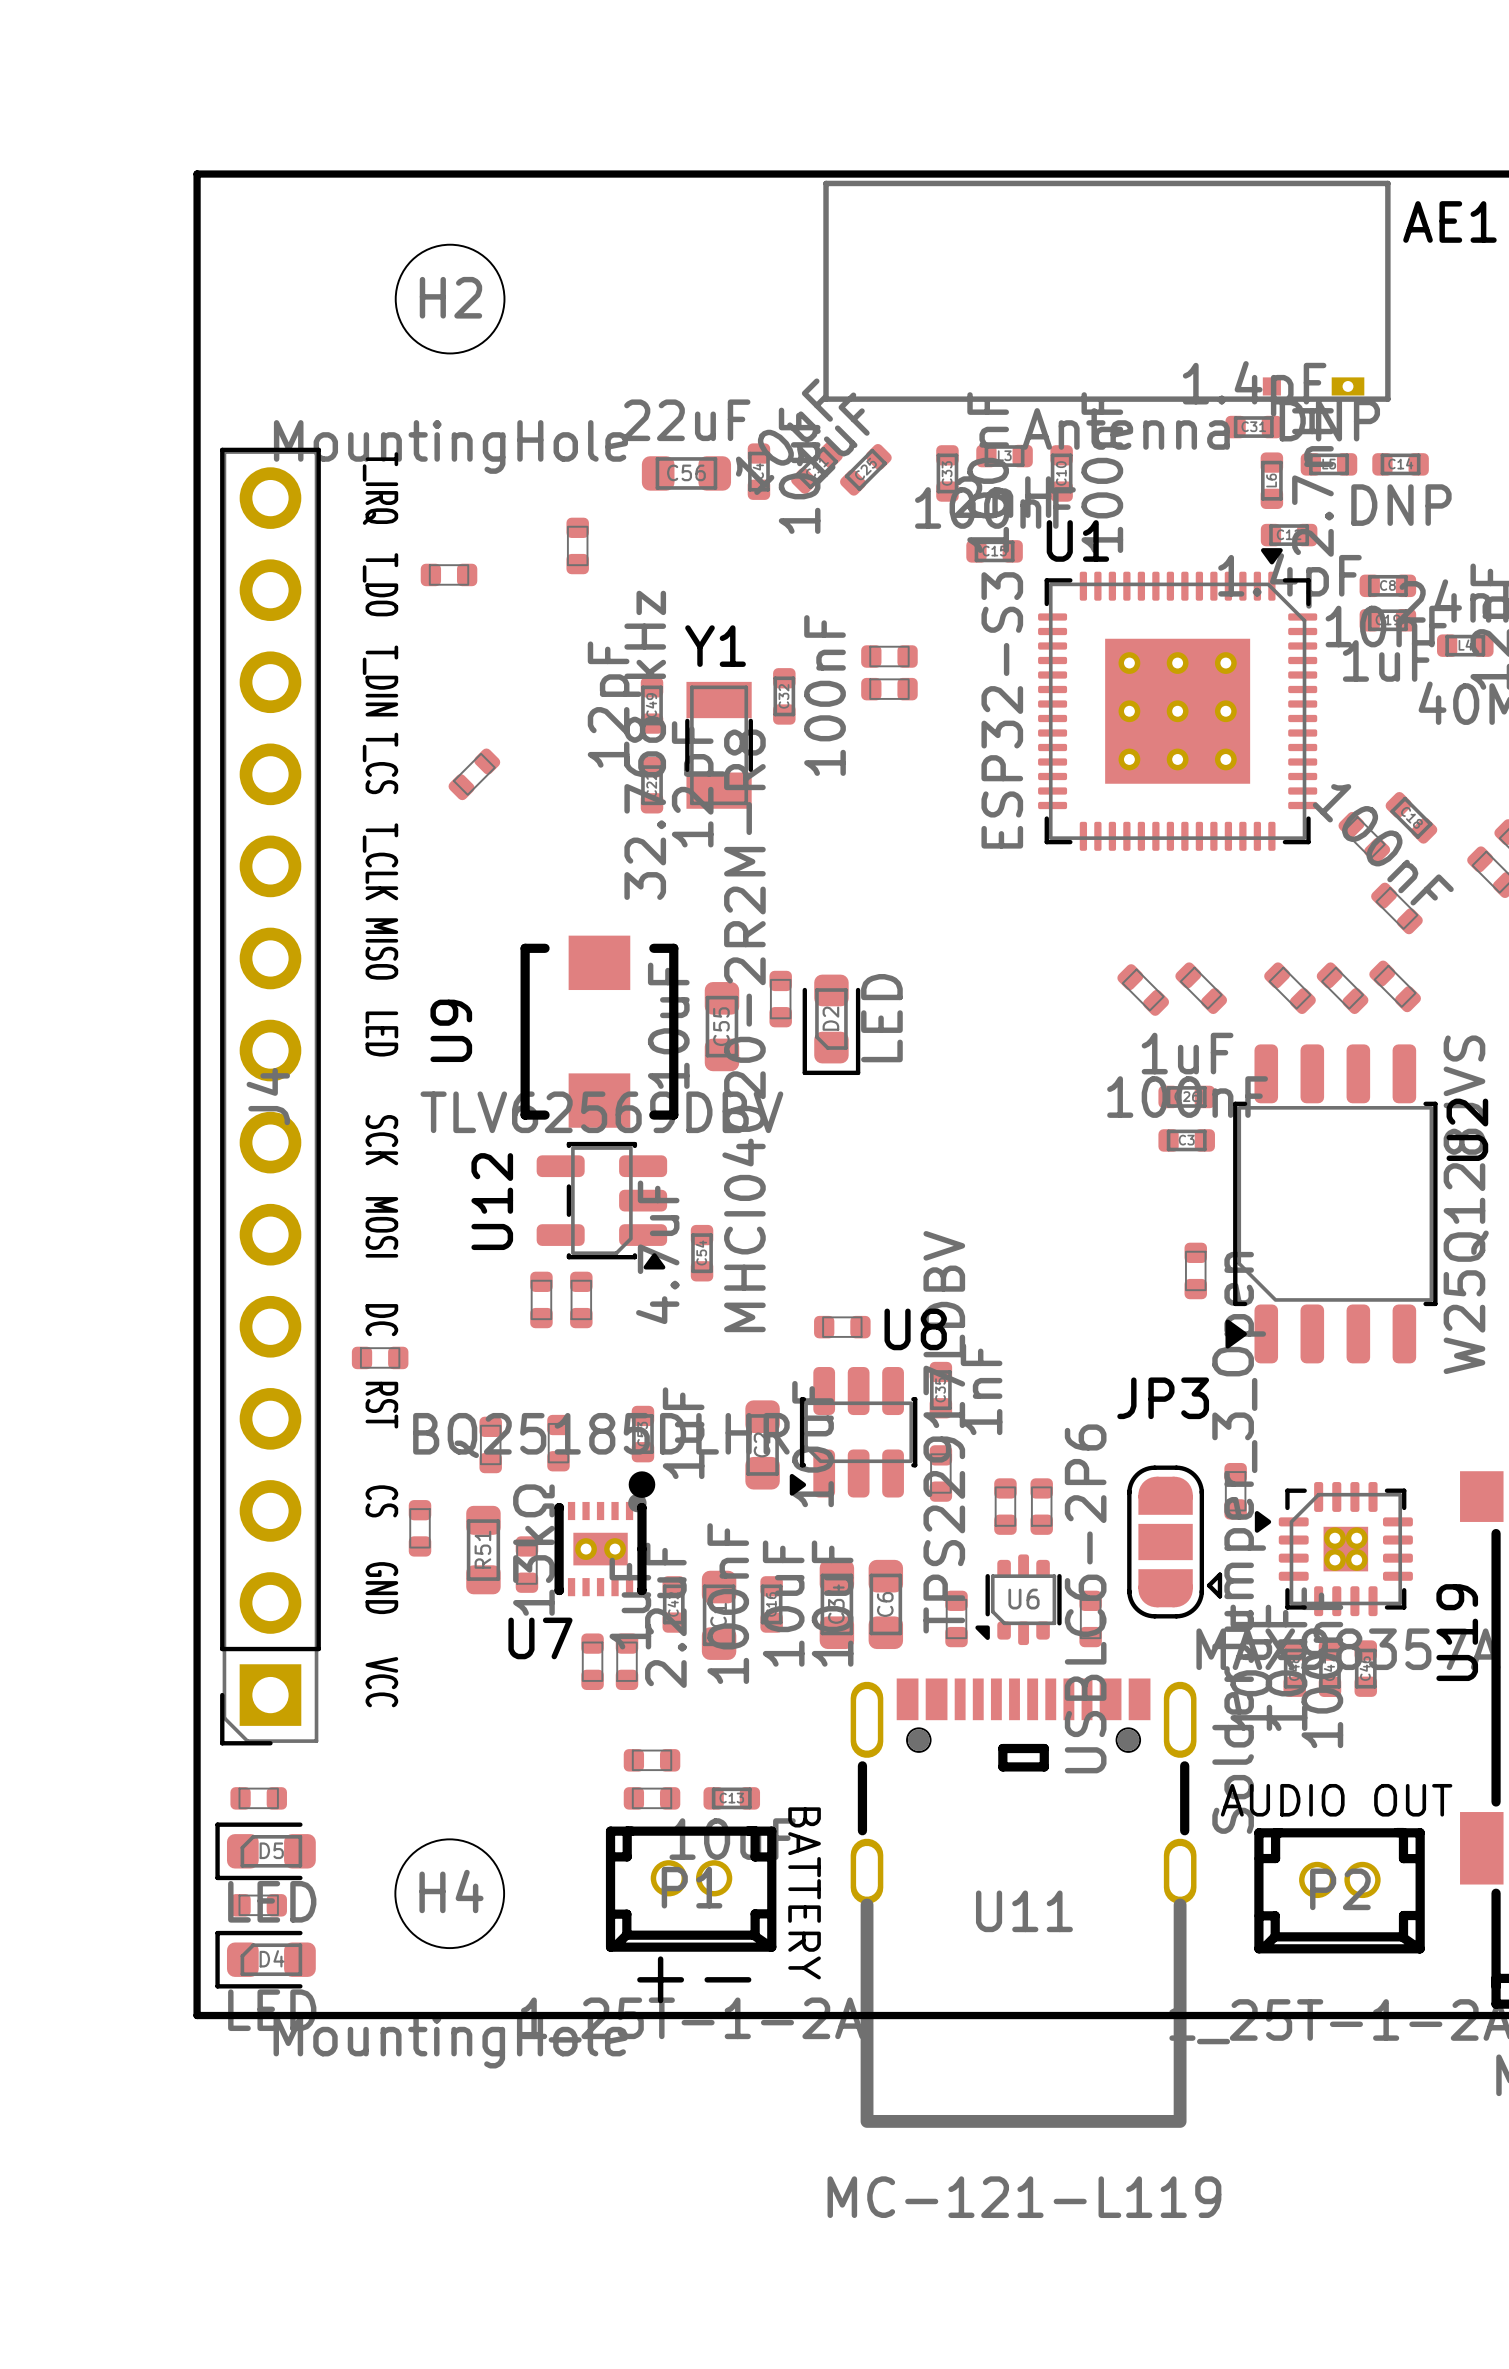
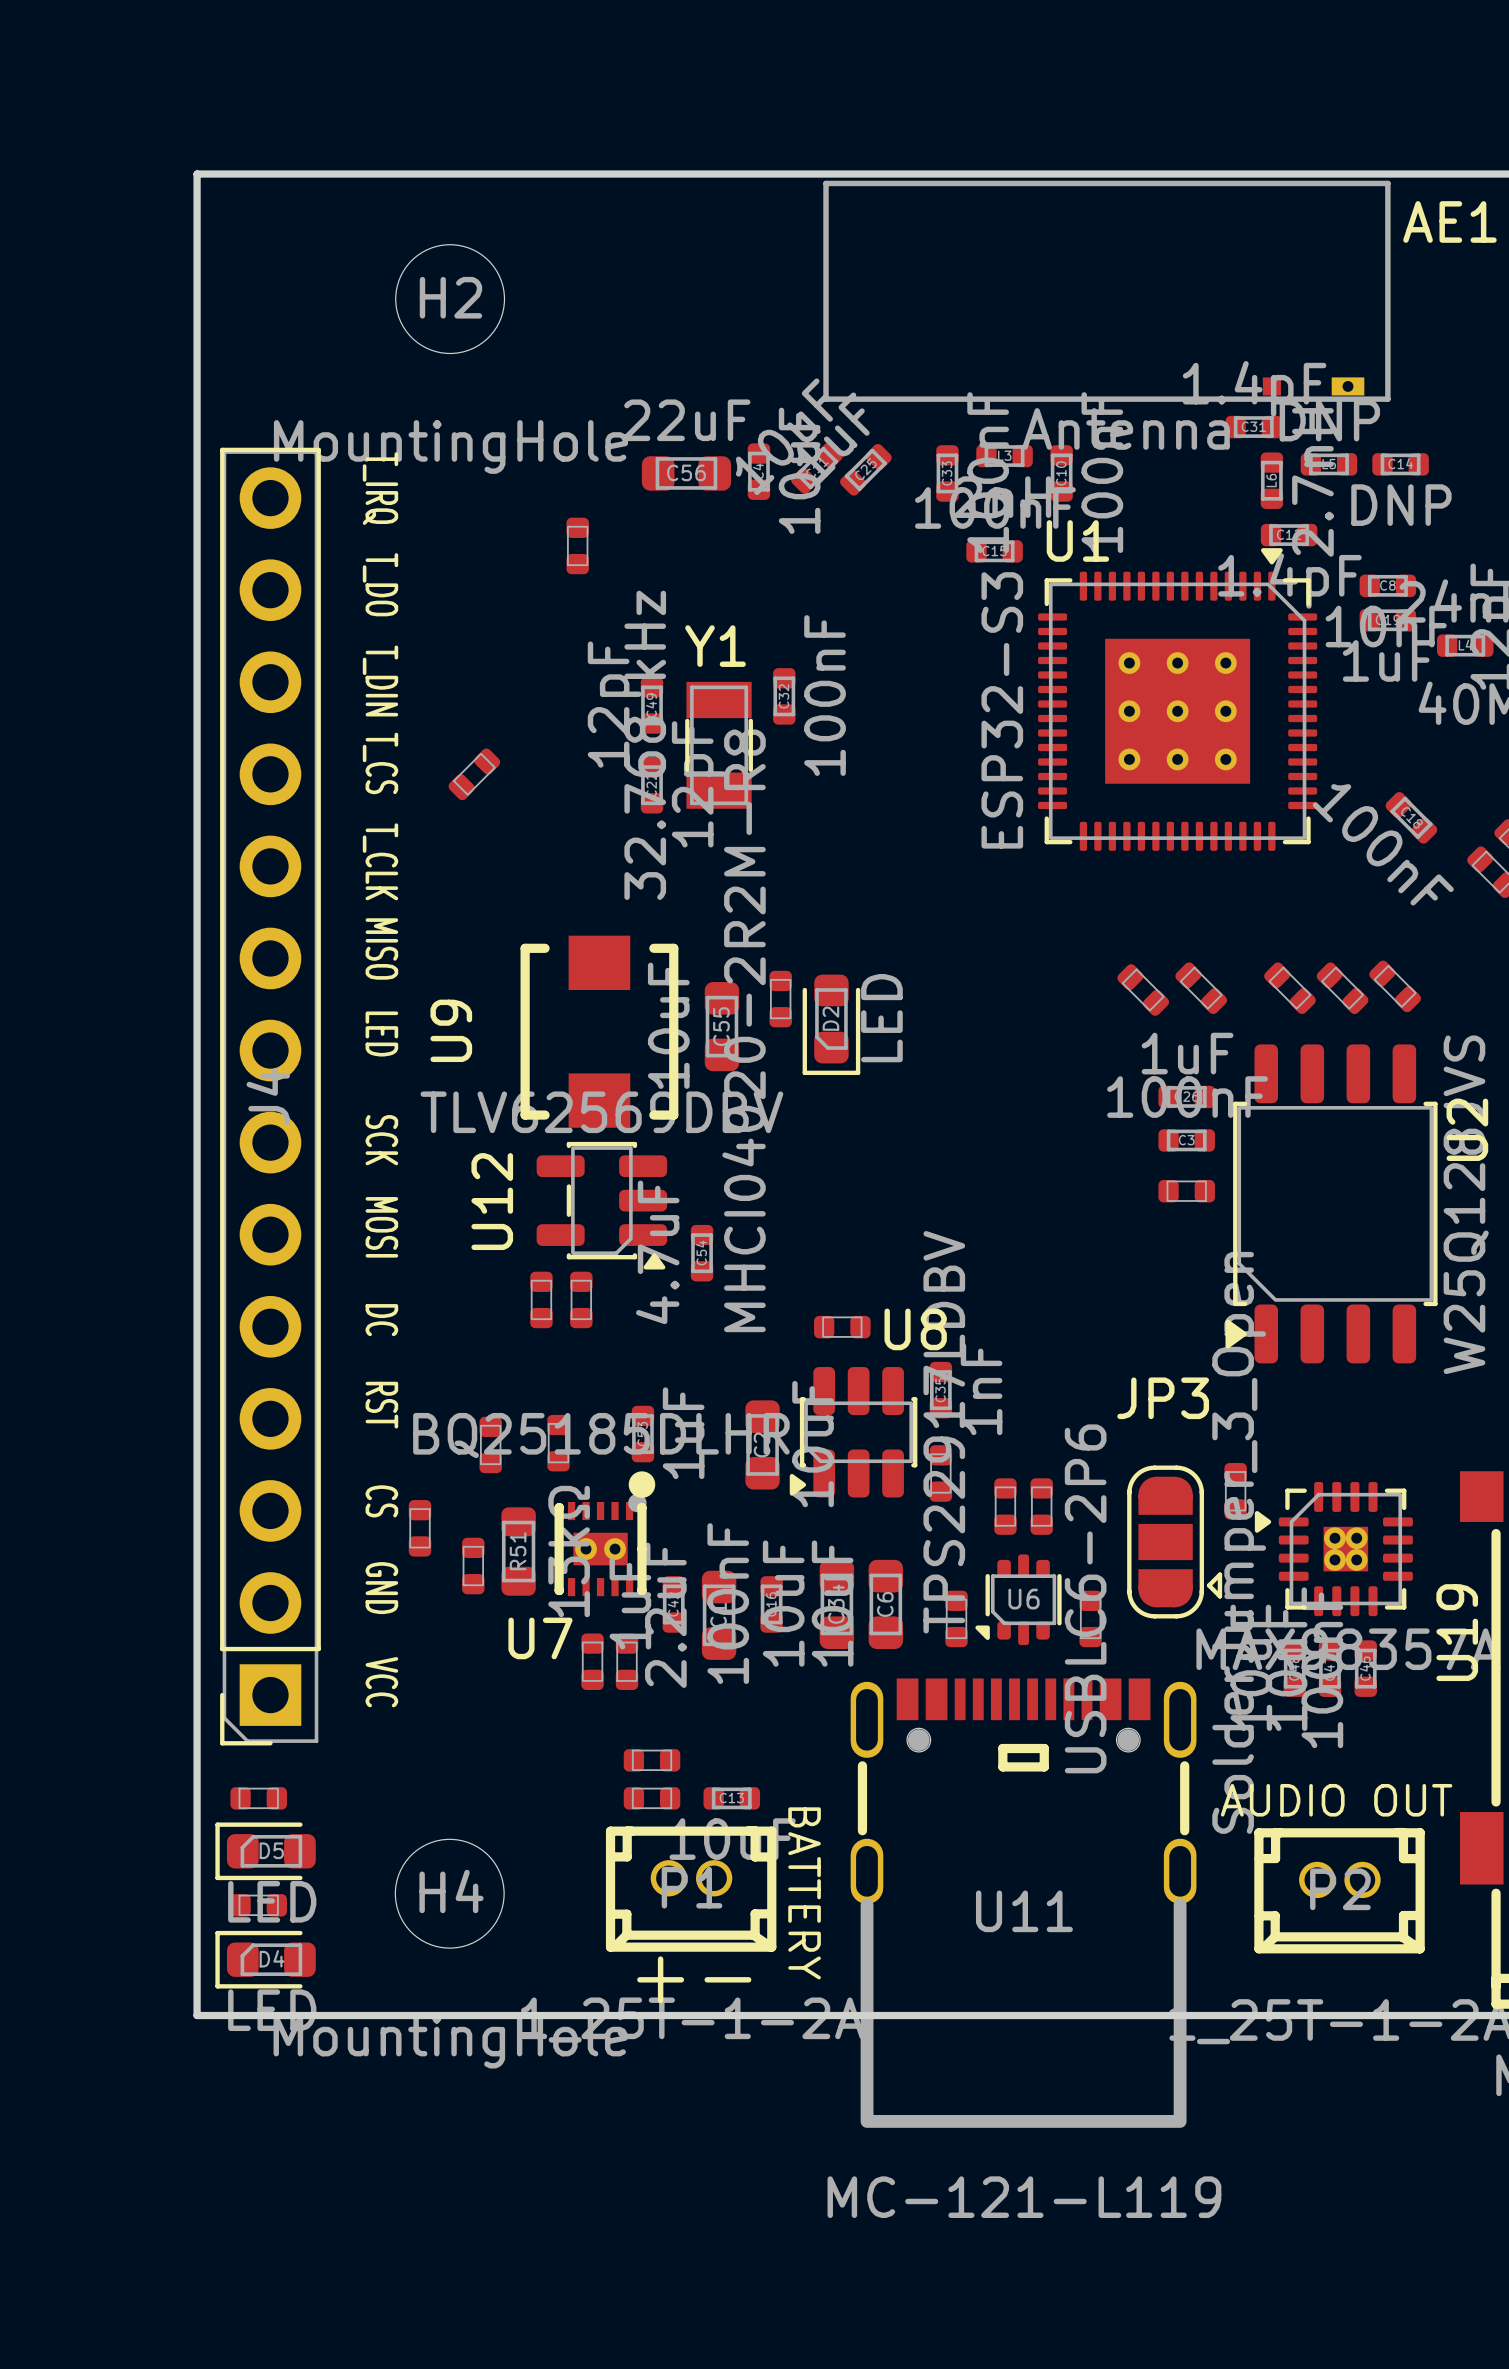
part: (449, 574) -> none
part: (889, 656) -> none
part: (889, 689) -> none
part: (1364, 837) -> none
part: (1396, 908) -> none
part rotation: 0° (1195, 1270) -> 90° clockwise (1186, 1191)
part position: (1195, 1270) -> (1186, 1191)
part: (380, 1357) -> none
R51 position: (483, 1550) -> (518, 1551)
part position: (526, 1564) -> (473, 1566)

